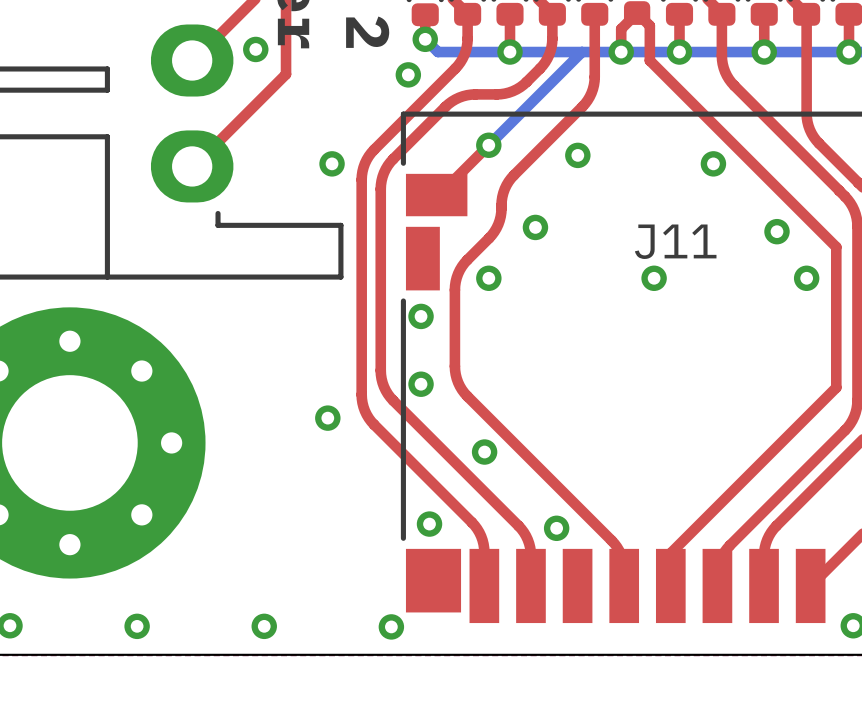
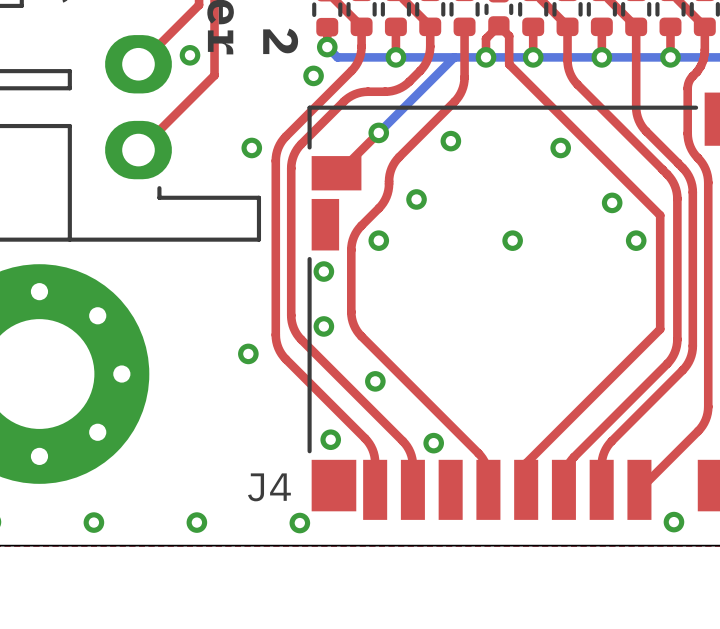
J11 name: J11 (675, 241) -> J4 (269, 487)

